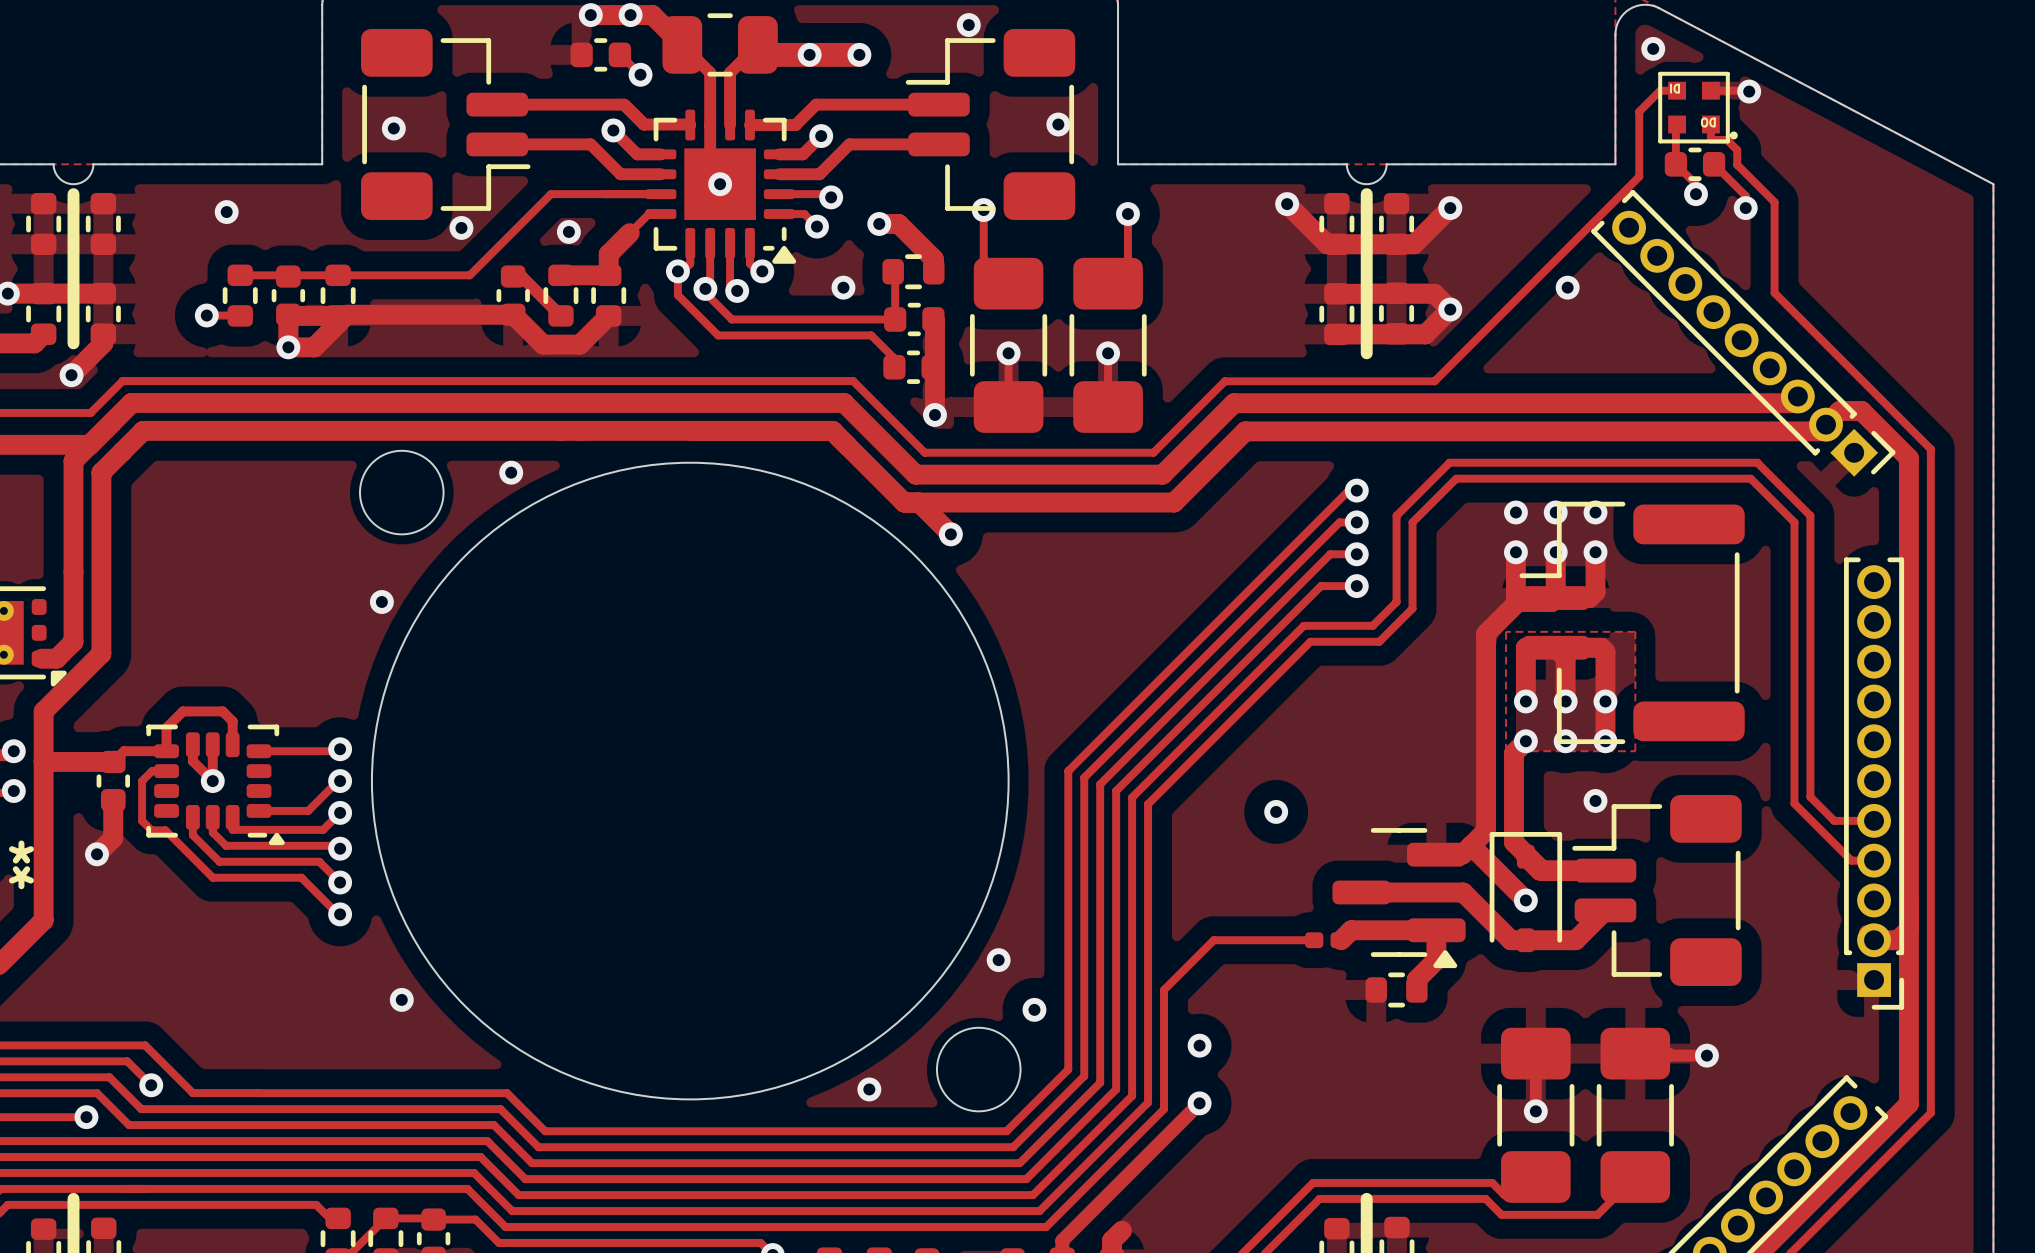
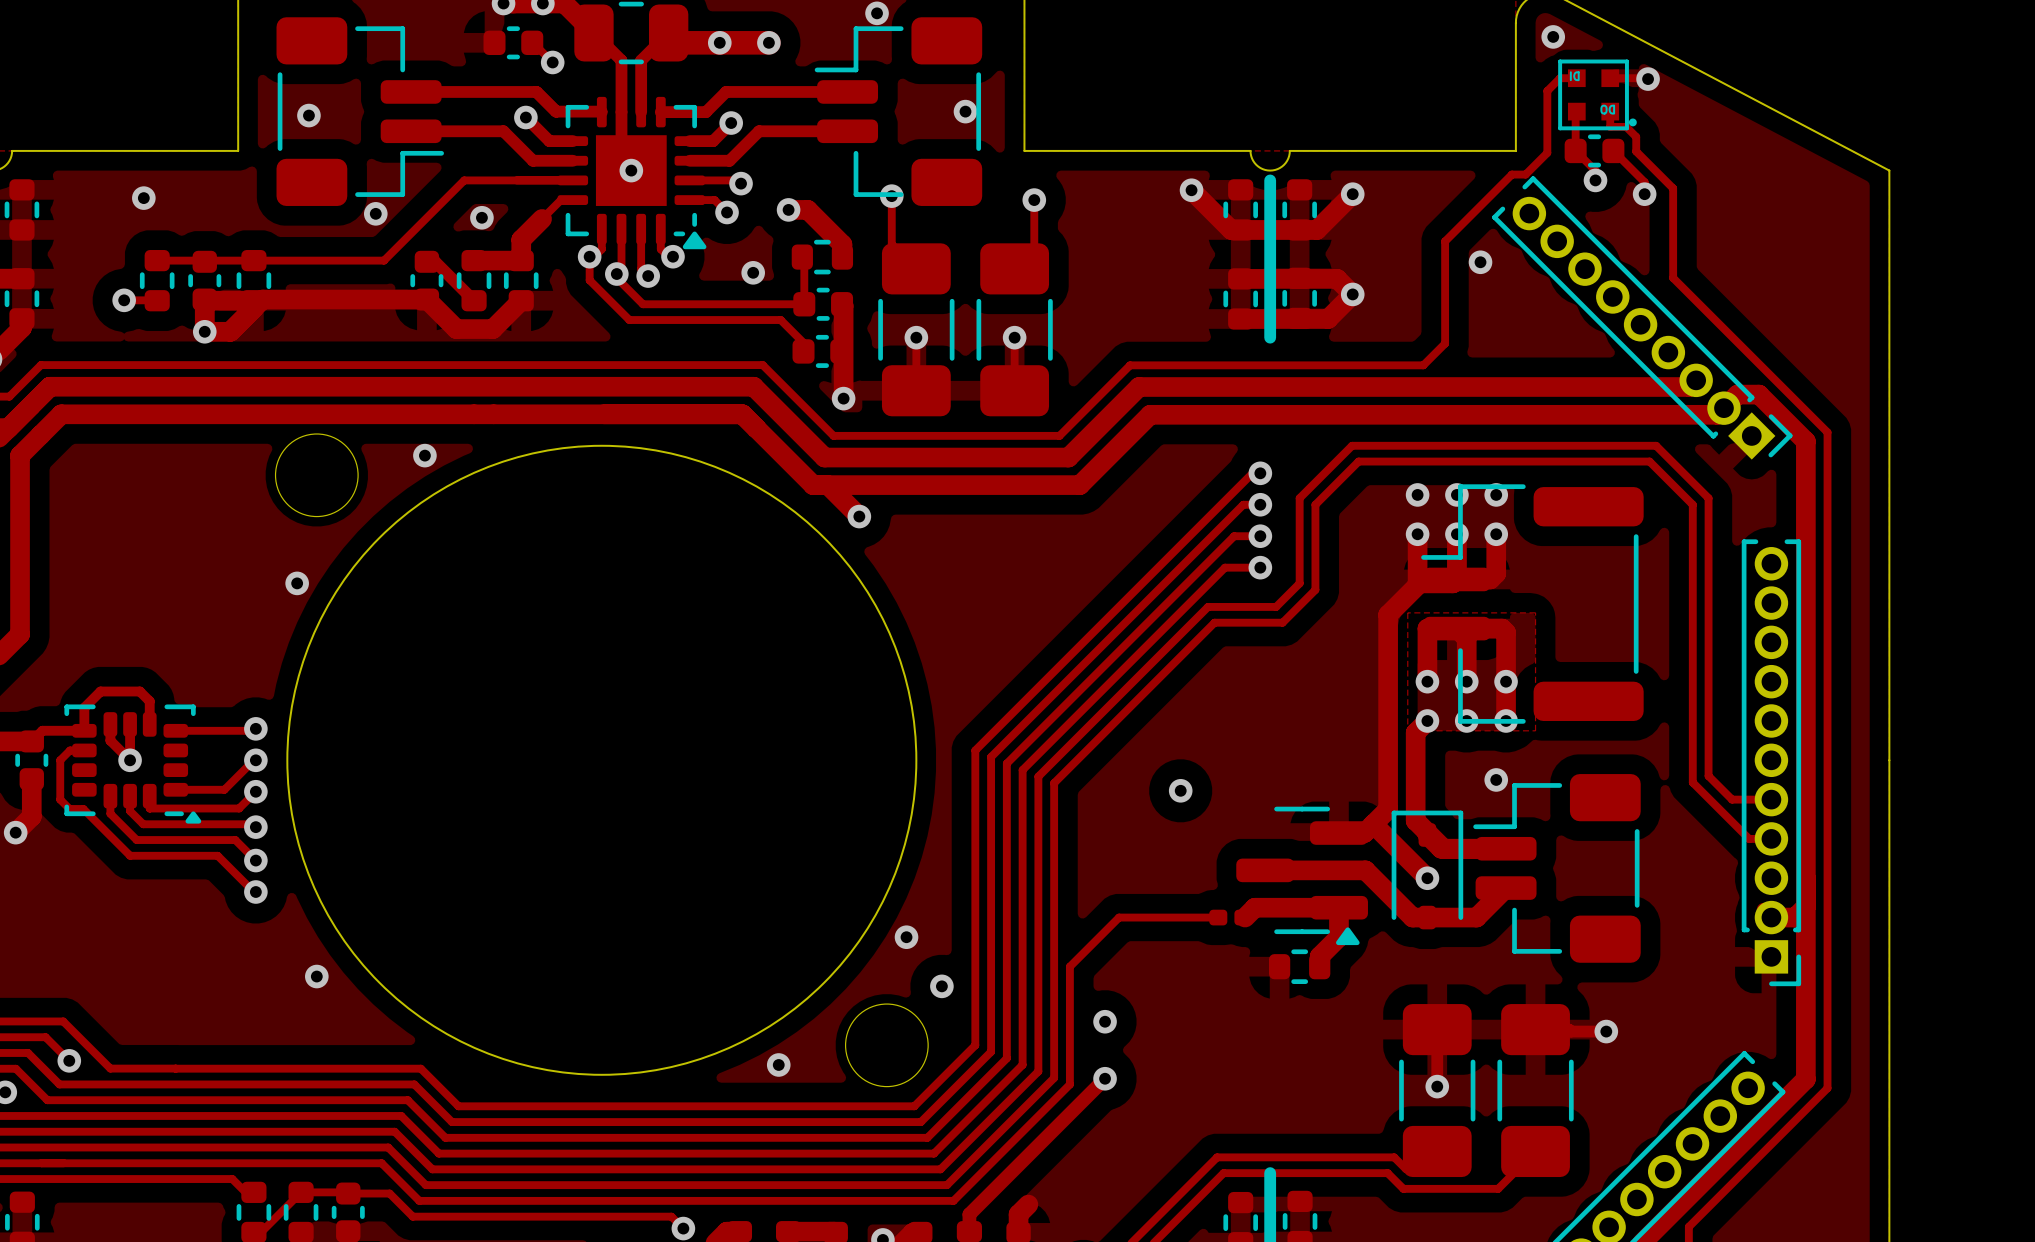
track: (1647, 103) (1639, 111) (1639, 176) (1434, 381) -> (1547, 90) (1547, 152) (1525, 174) (1511, 174) (1445, 241) (1445, 343) (1423, 365) (1337, 365)
via position: (1567, 287) -> (1480, 262)

